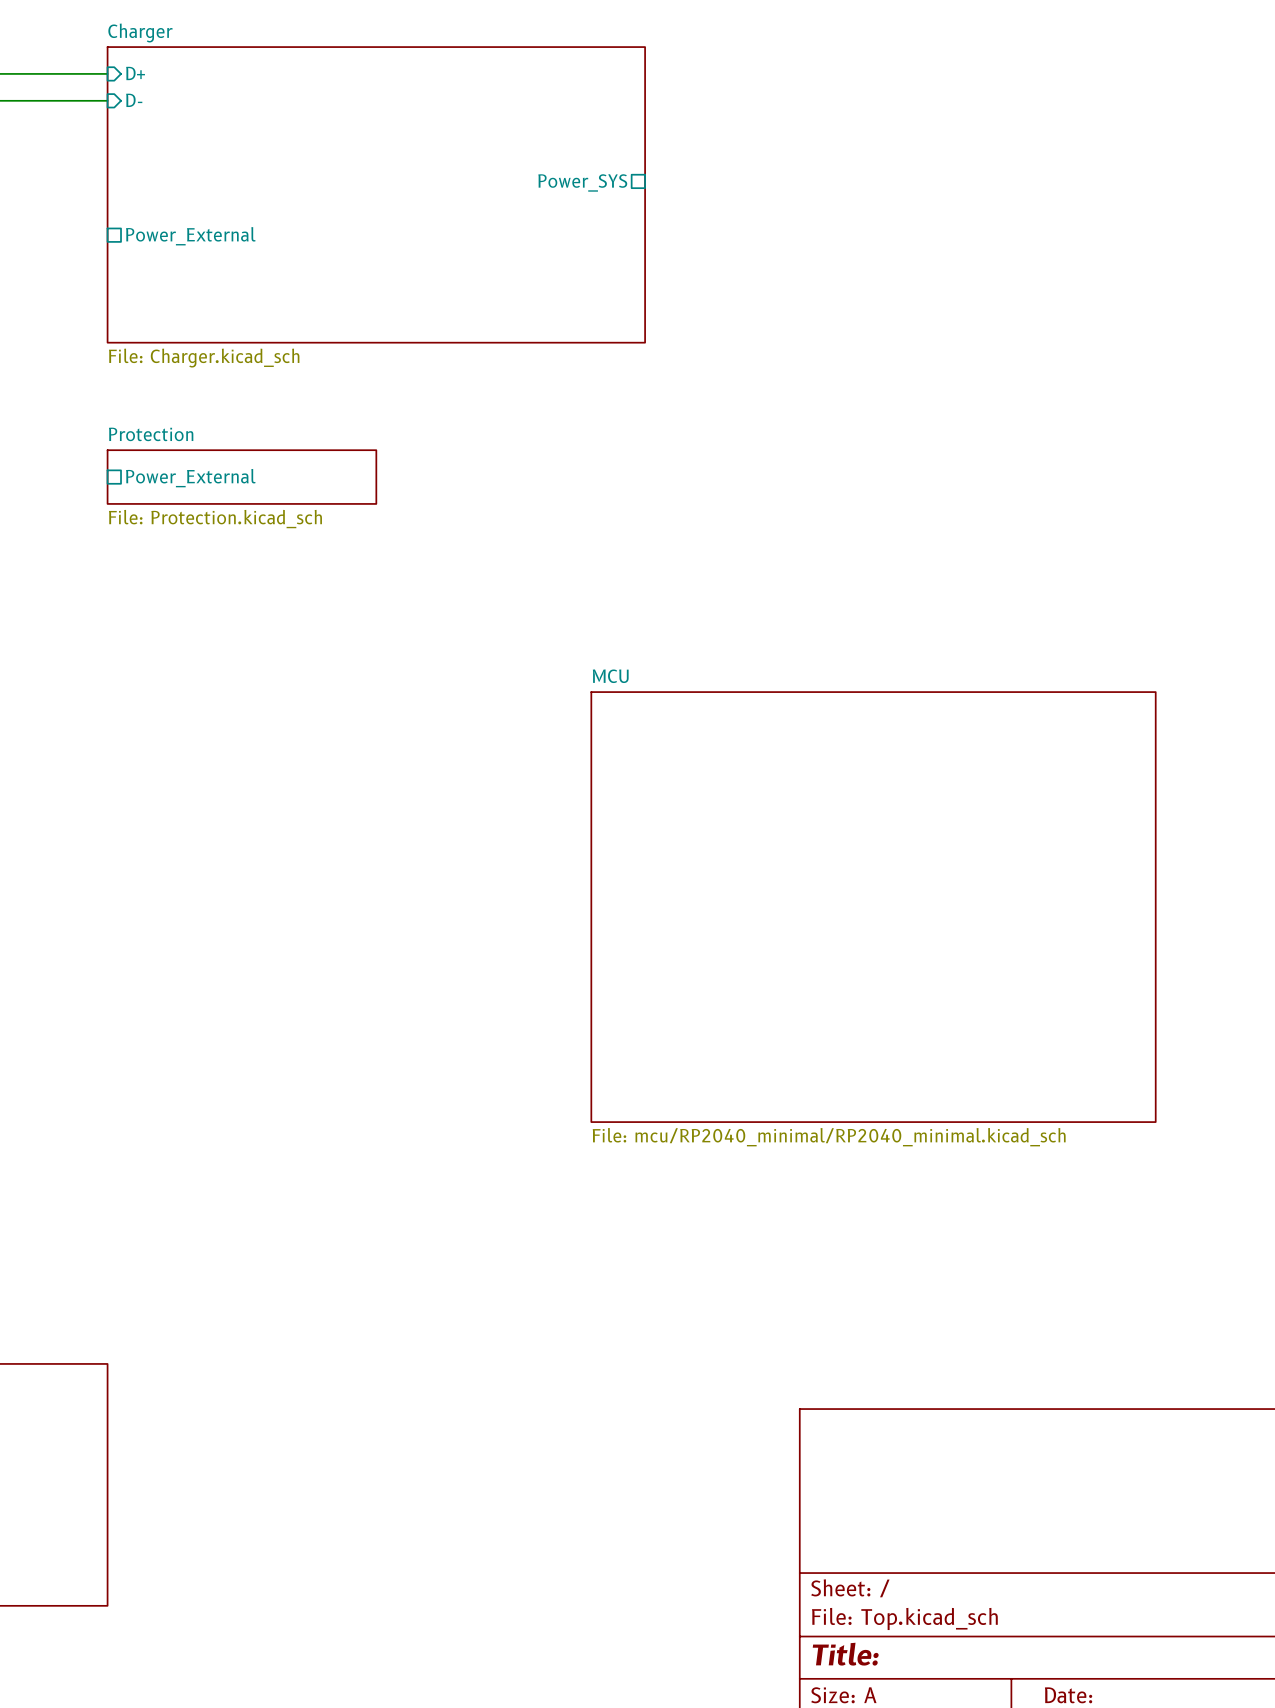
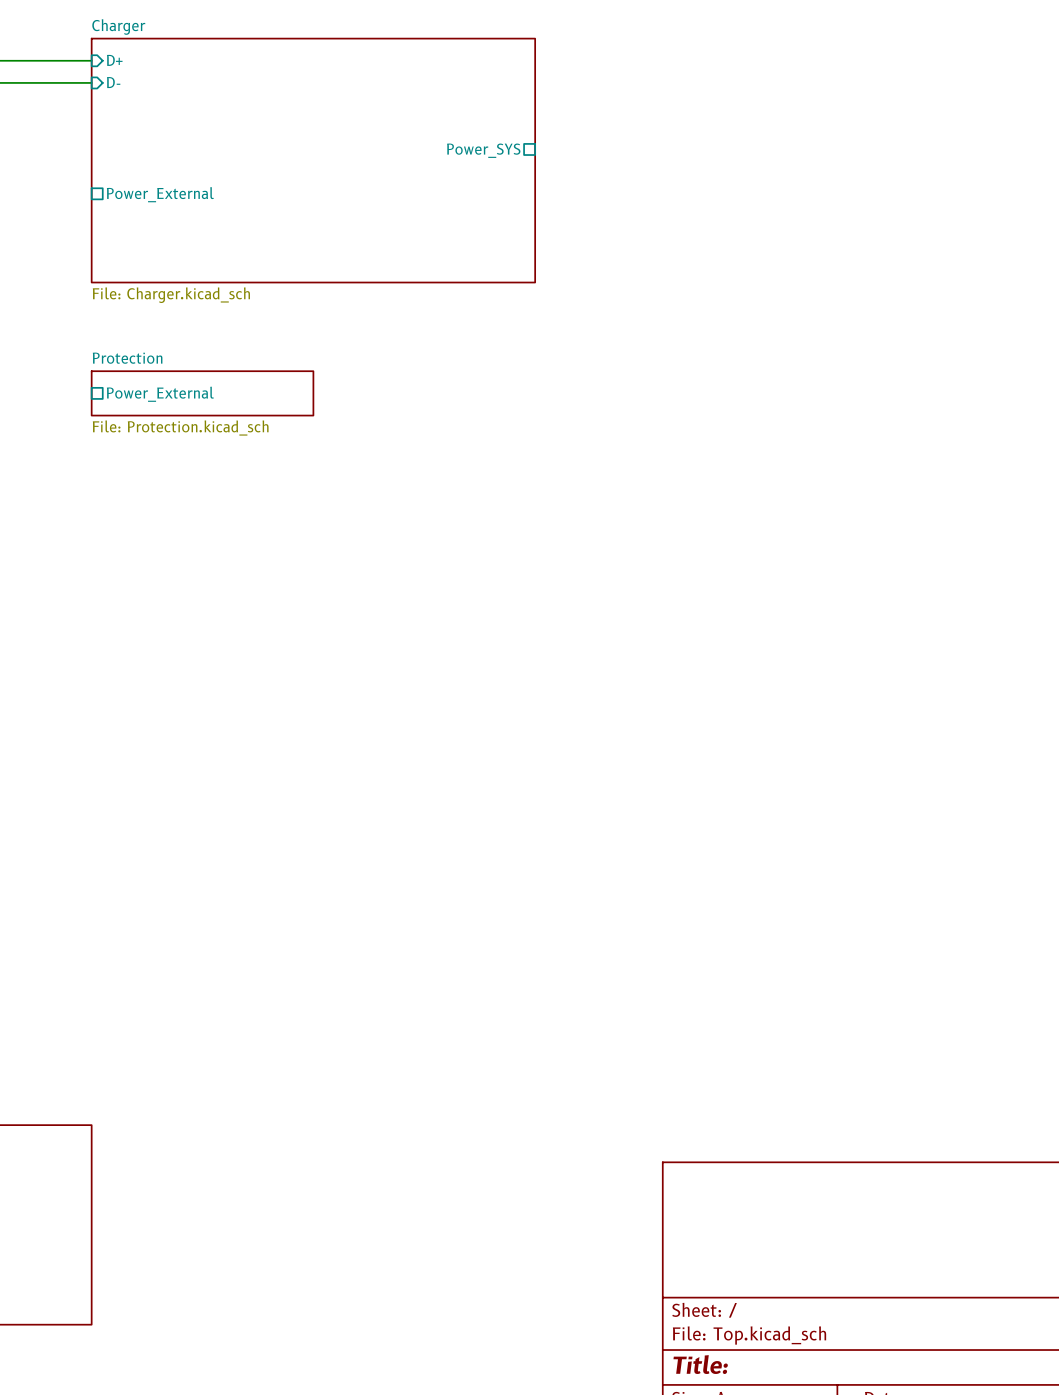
sheet MCU: File: mcu/RP2040_minimal/RP2040_minimal.kicad_sch (873, 907) -> none

